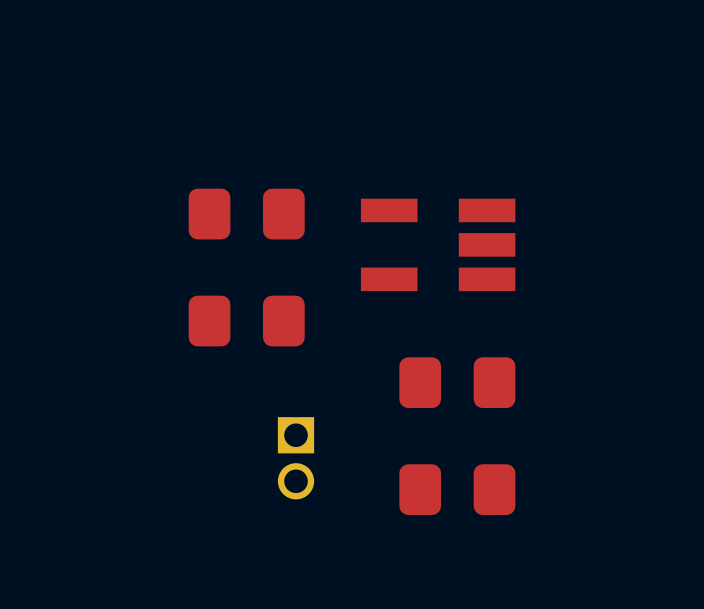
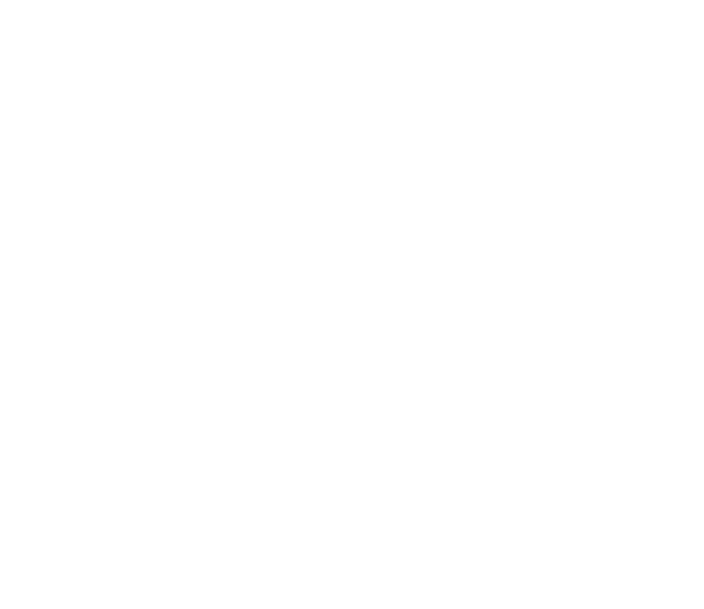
part: (246, 214) -> none
part: (438, 244) -> none
part: (246, 321) -> none
part: (457, 382) -> none
part: (296, 458) -> none
part: (457, 489) -> none

